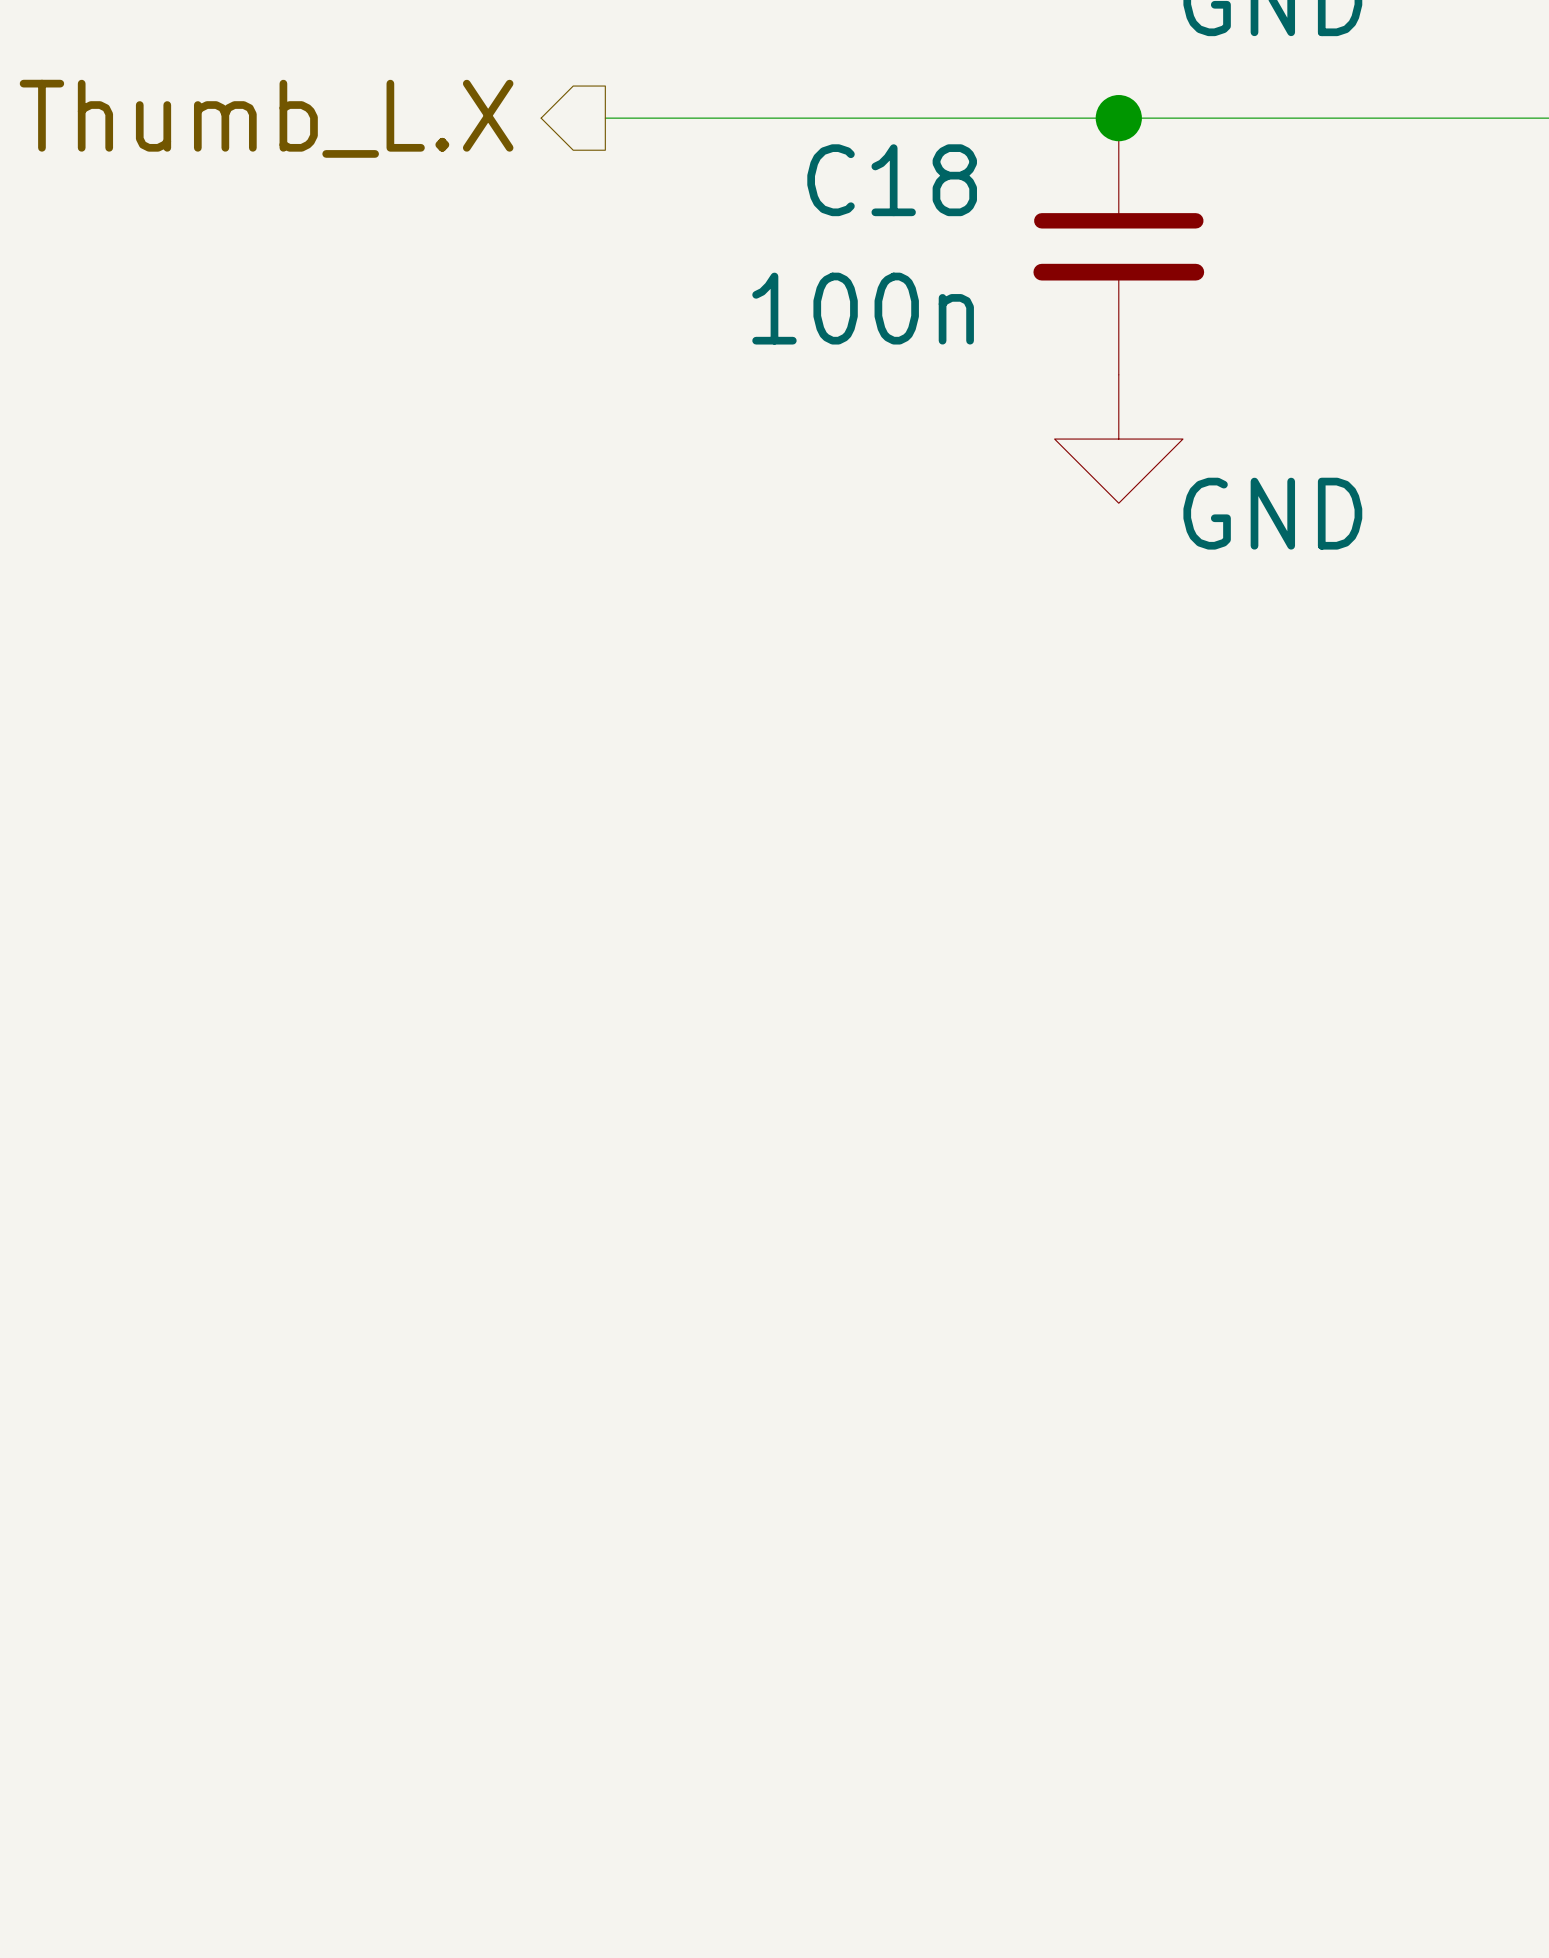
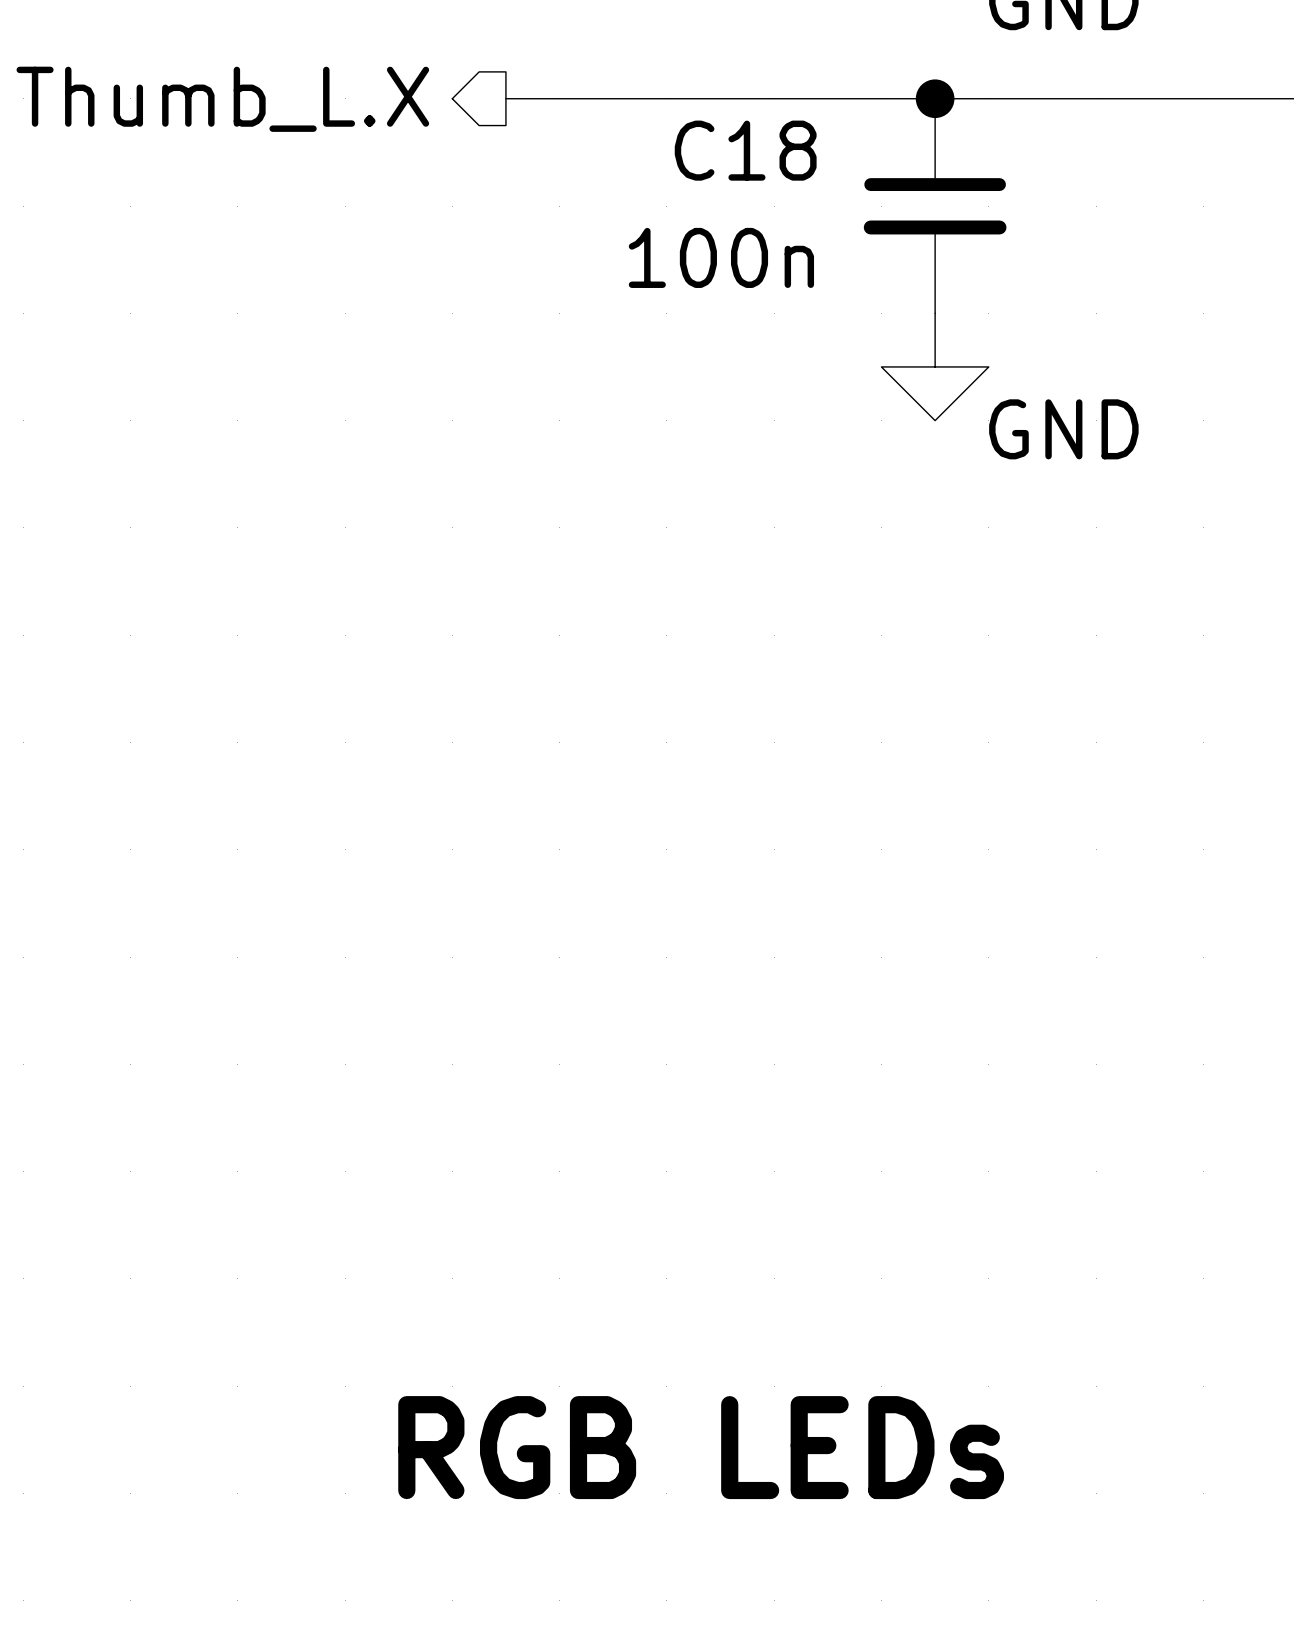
text: none -> RGB LEDs (701, 1447)

